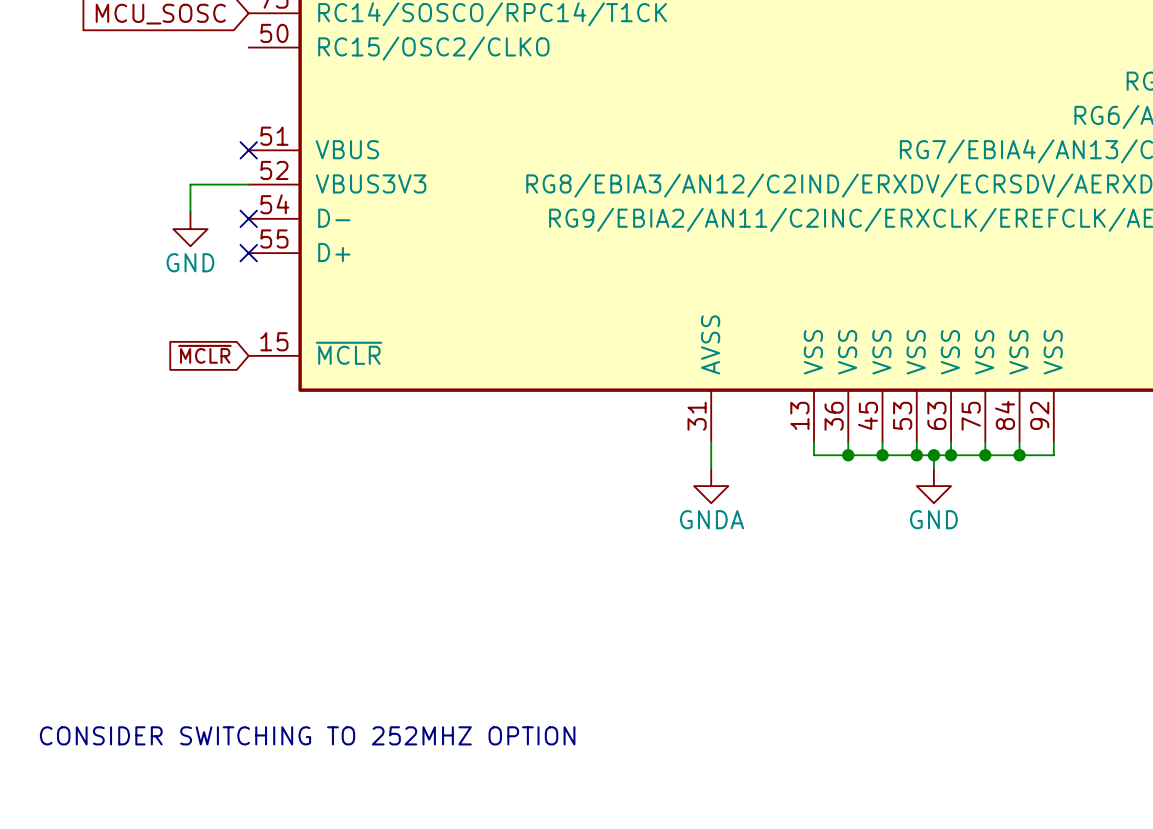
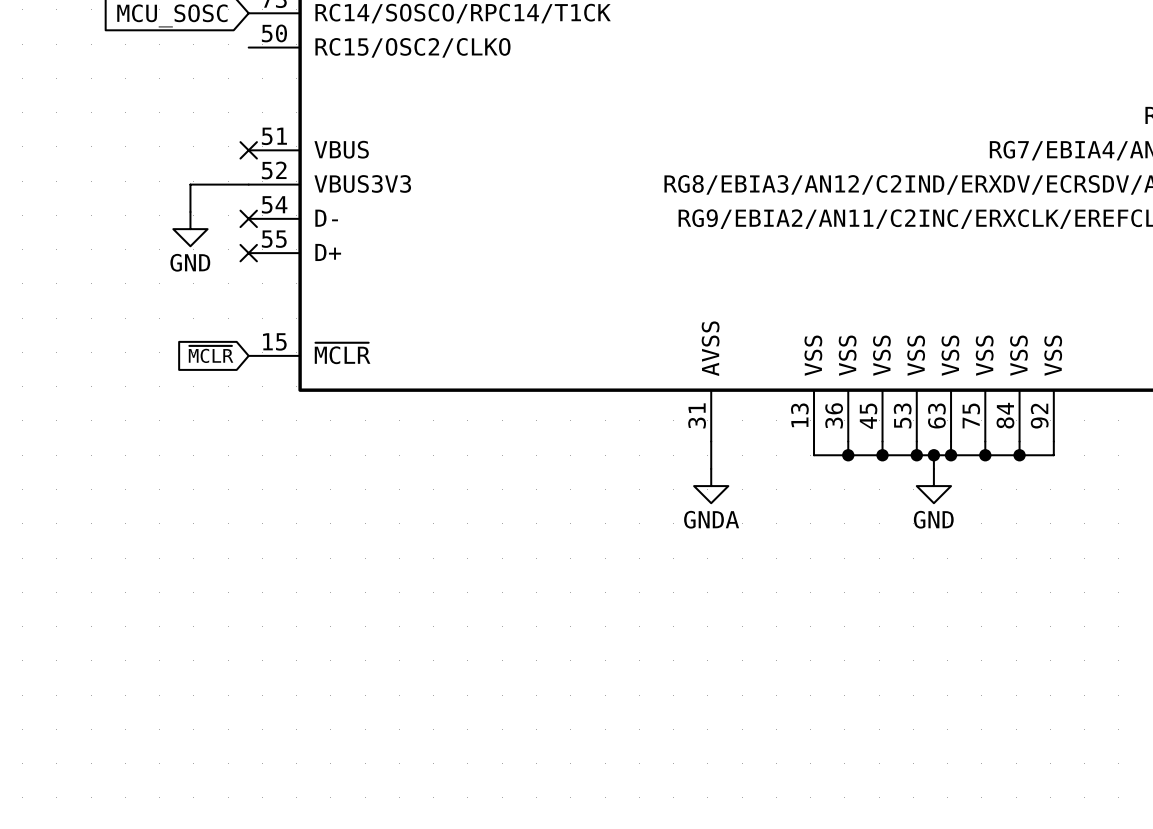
text: CONSIDER SWITCHING TO 252MHZ OPTION (307, 735) -> none

